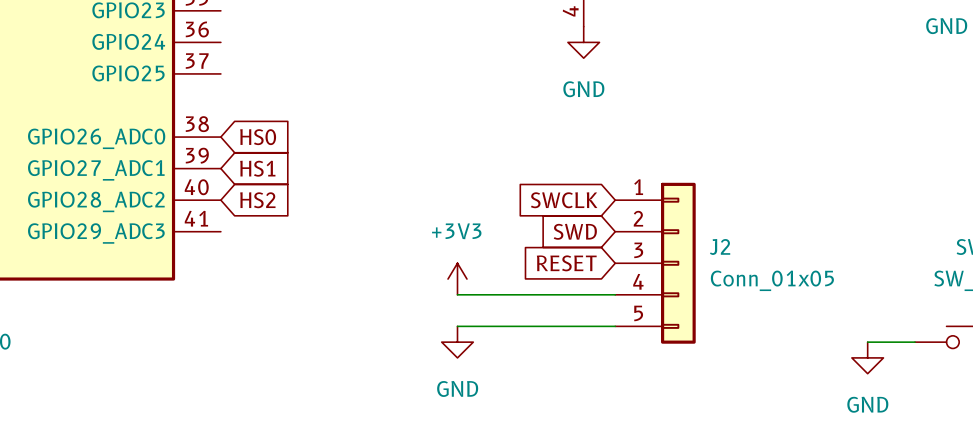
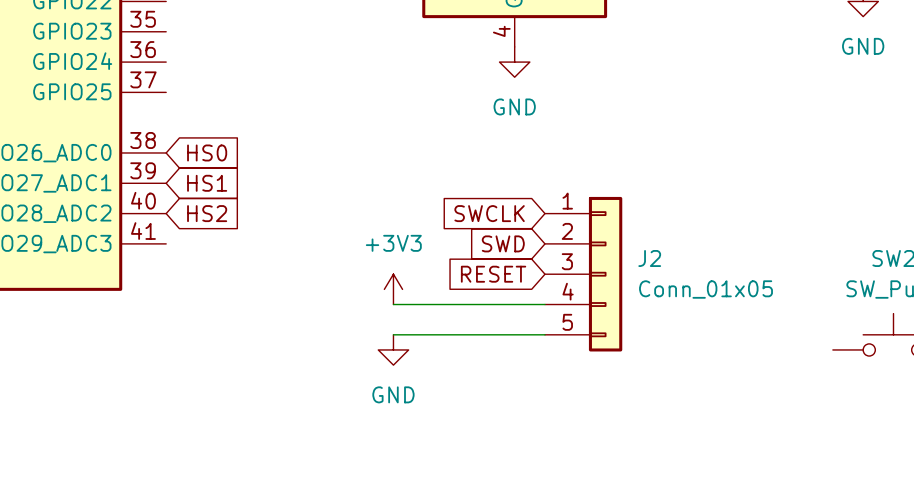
wire: (867, 342) (915, 342) -> none
power symbol: GND (867, 357) -> none

